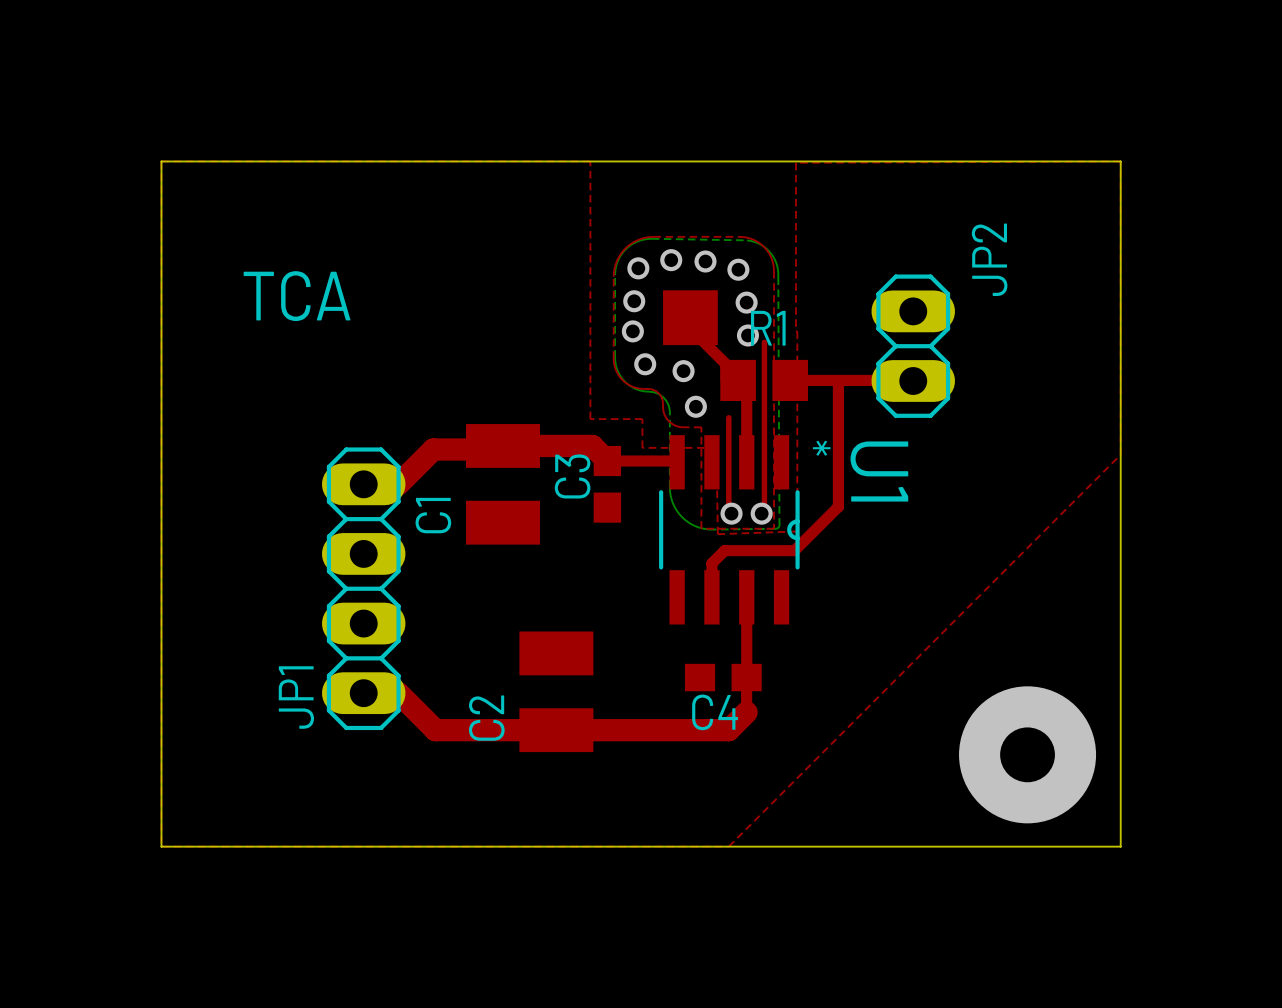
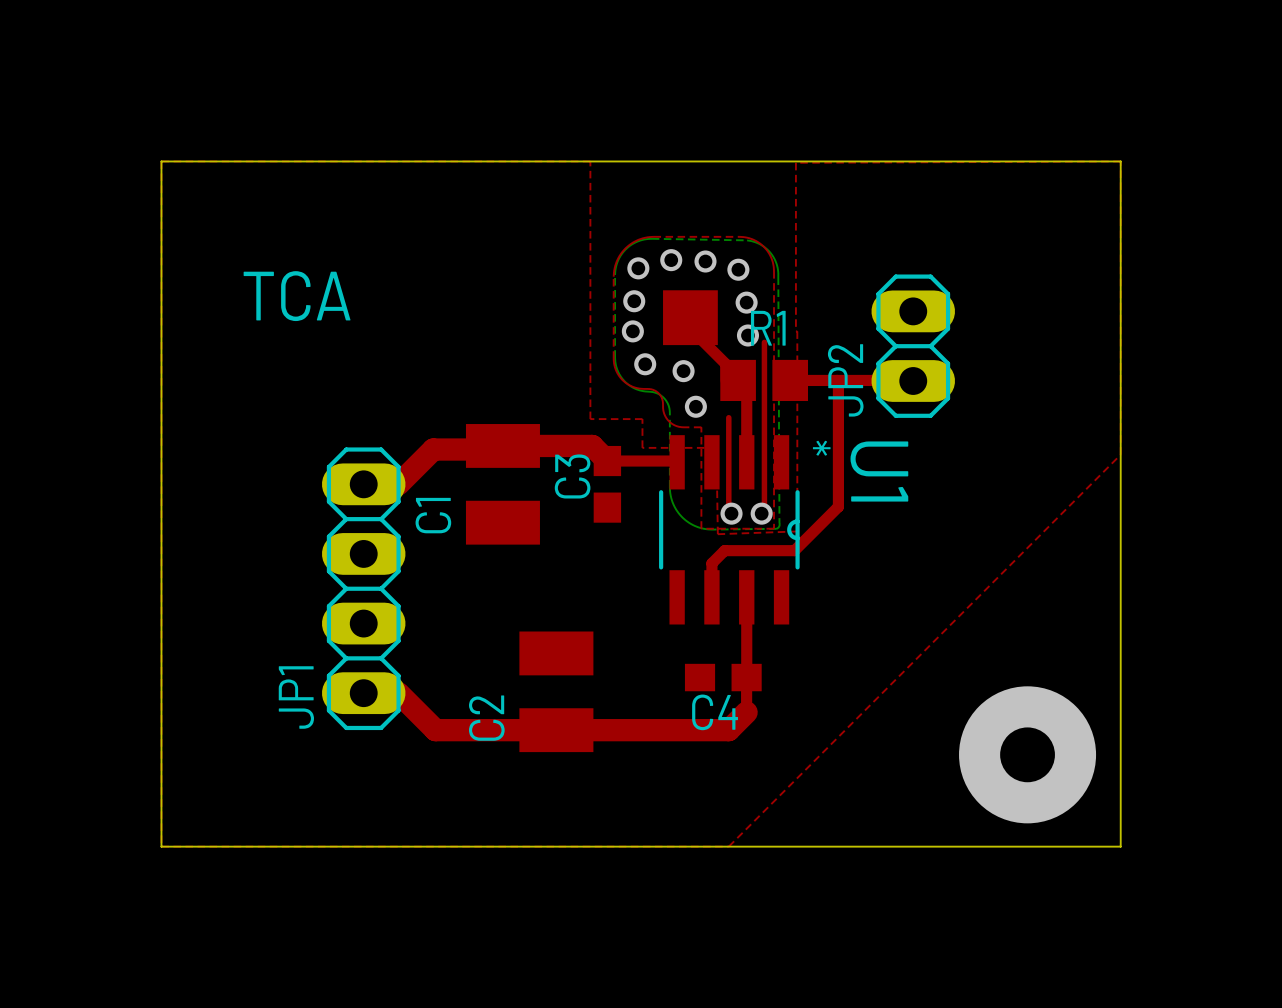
JP2 name position: JP2 (989, 259) -> JP2 (845, 380)

